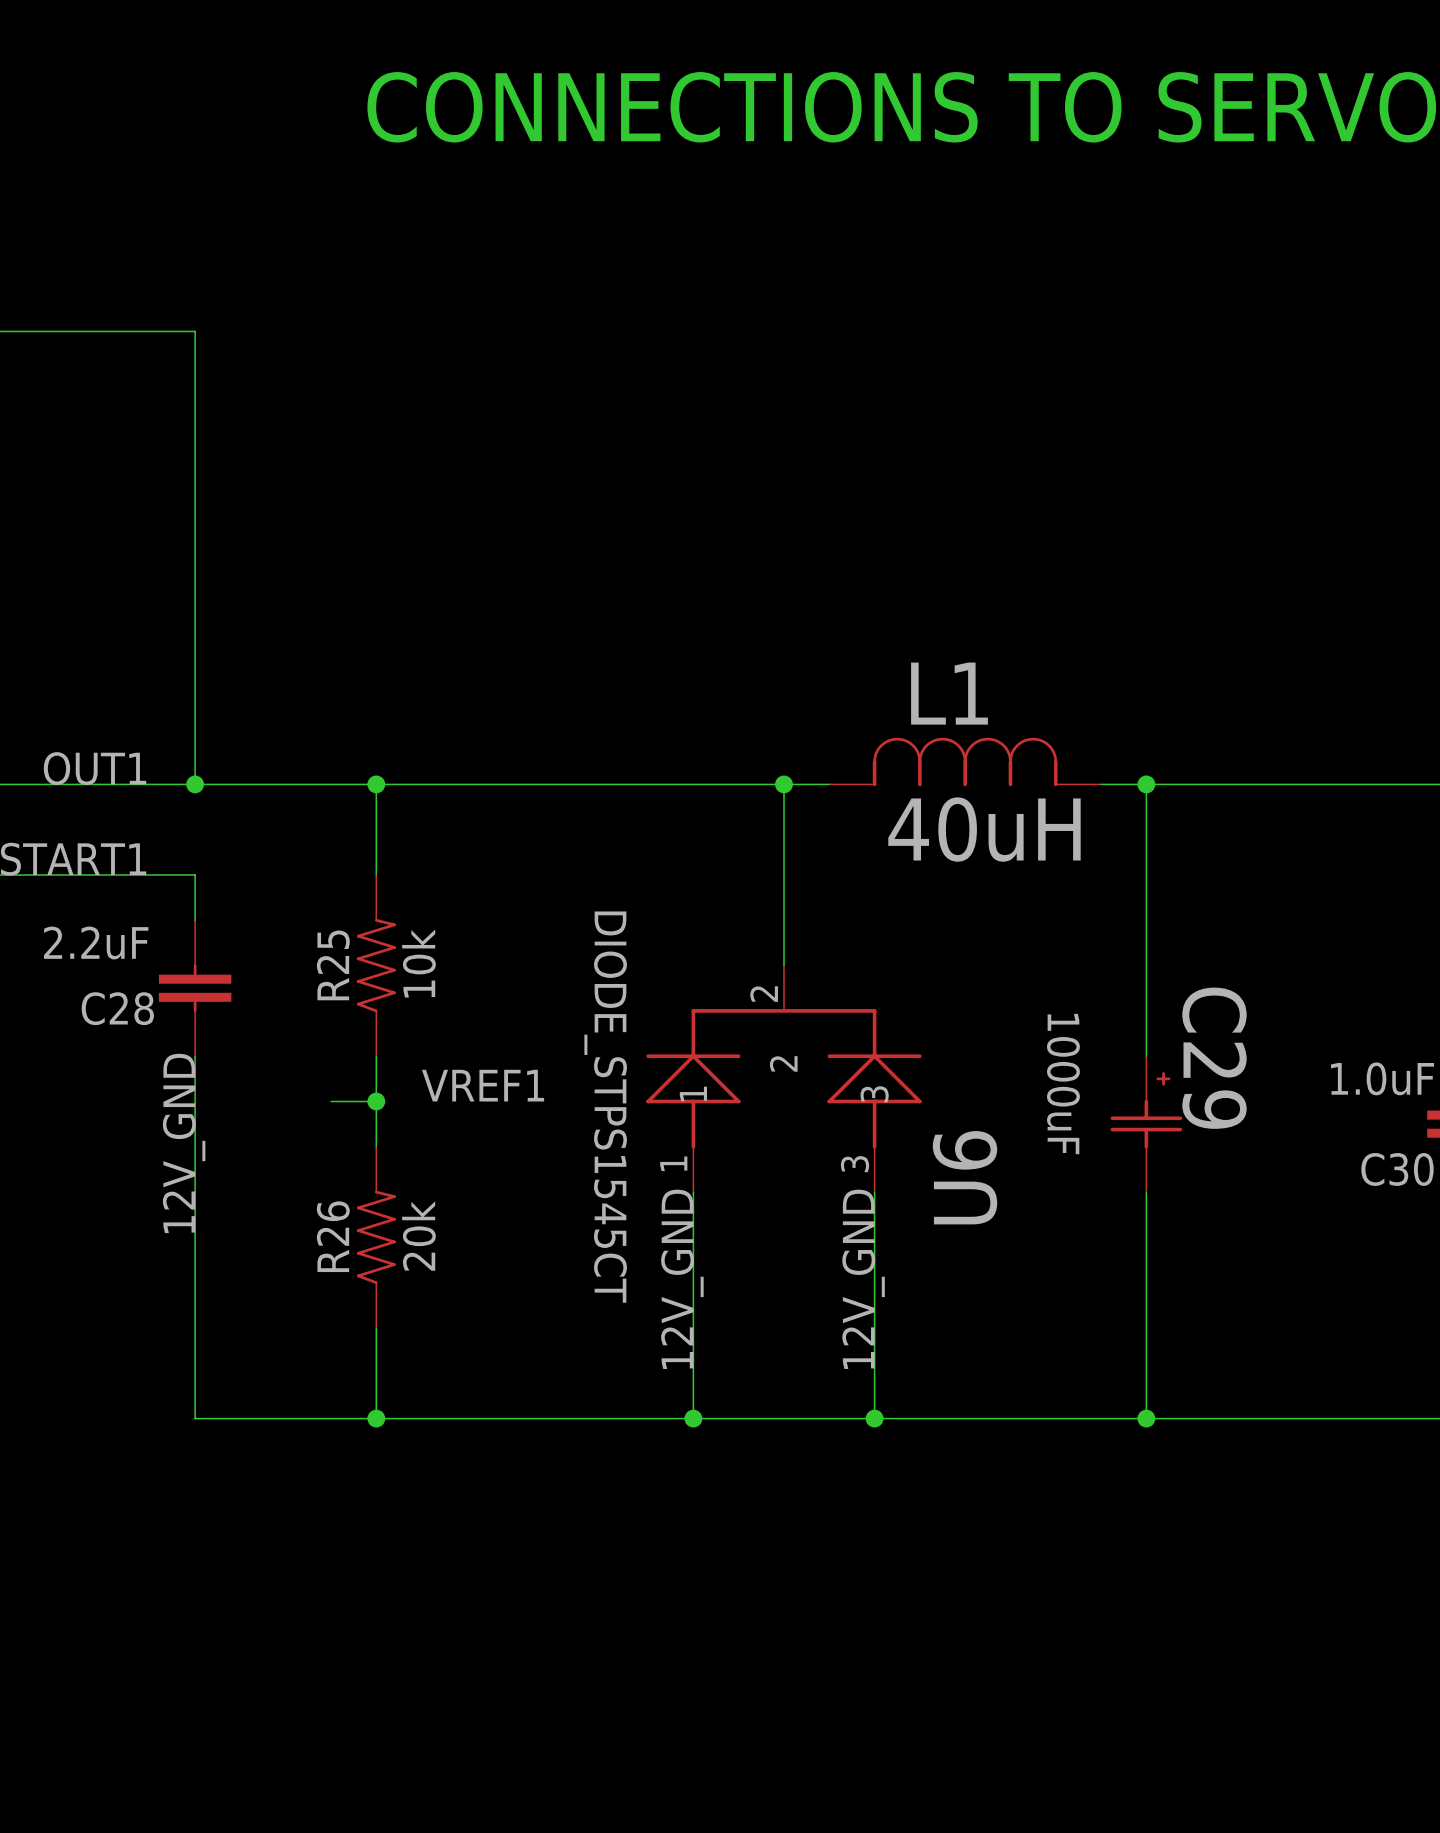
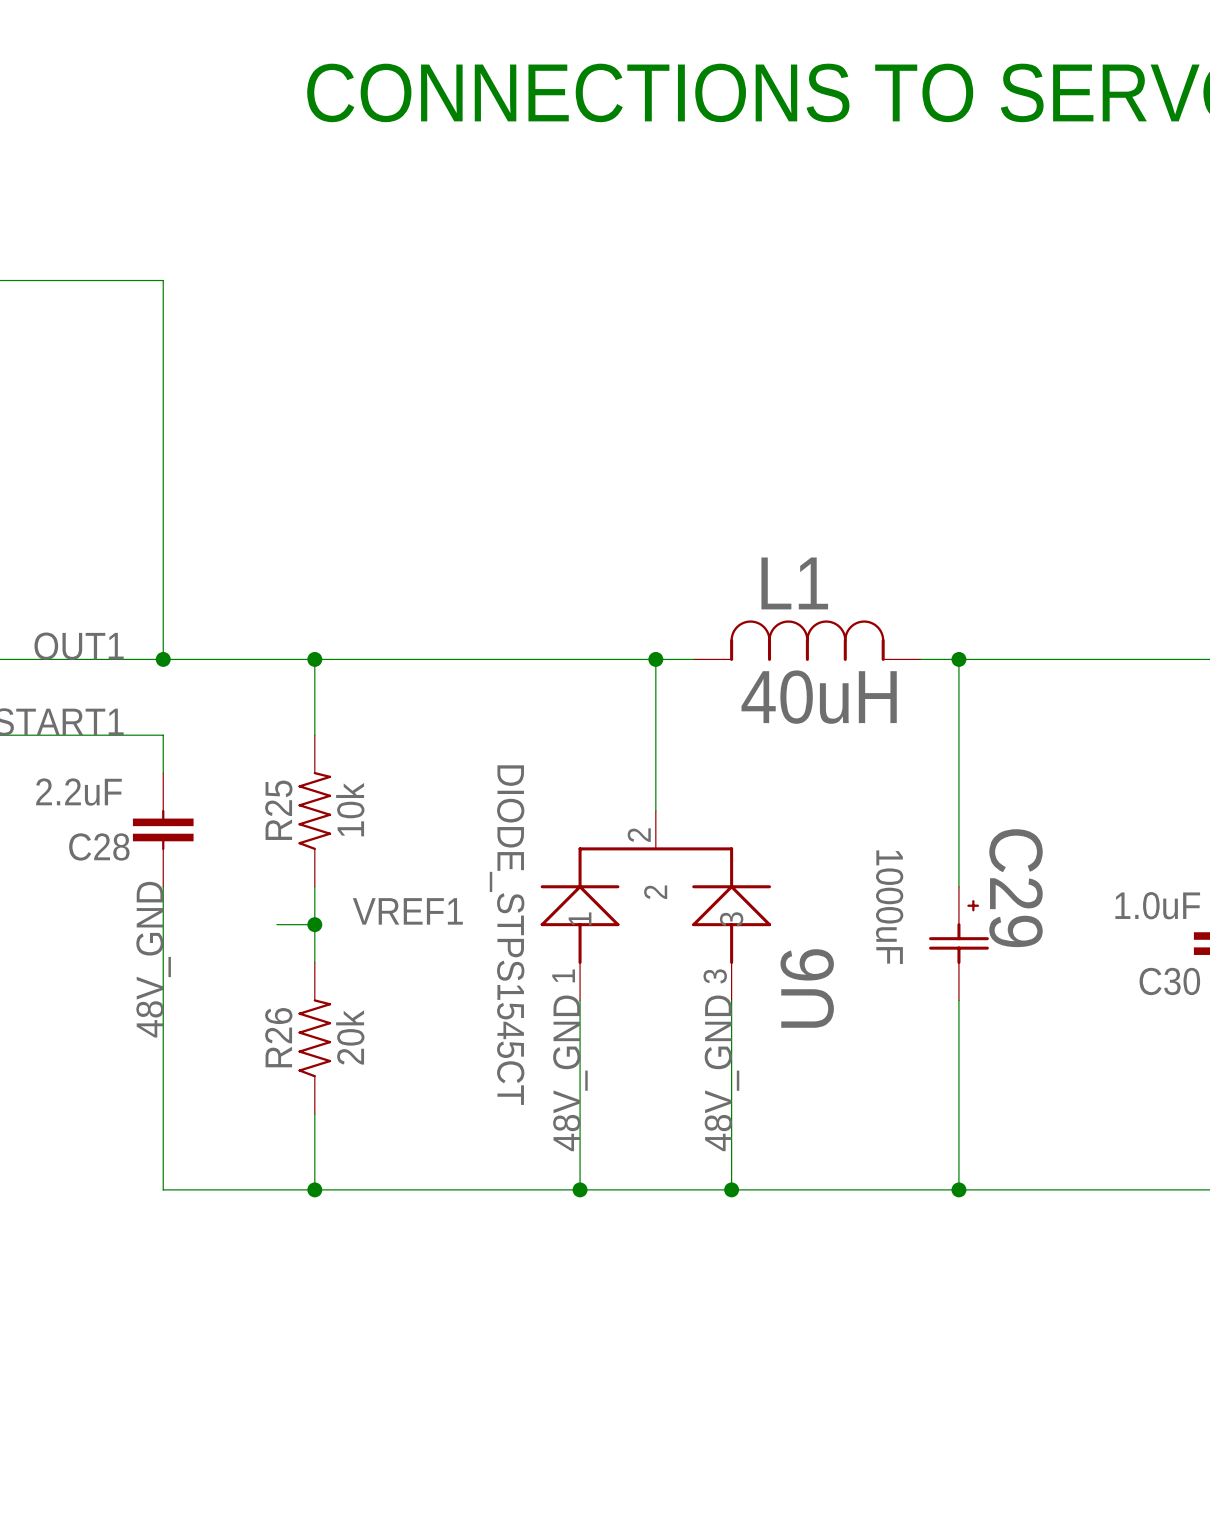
label: 12V_GND (184, 1143) -> 48V_GND (153, 959)
label: 12V_GND (682, 1279) -> 48V_GND (570, 1073)
label: 12V_GND (863, 1279) -> 48V_GND (721, 1073)

